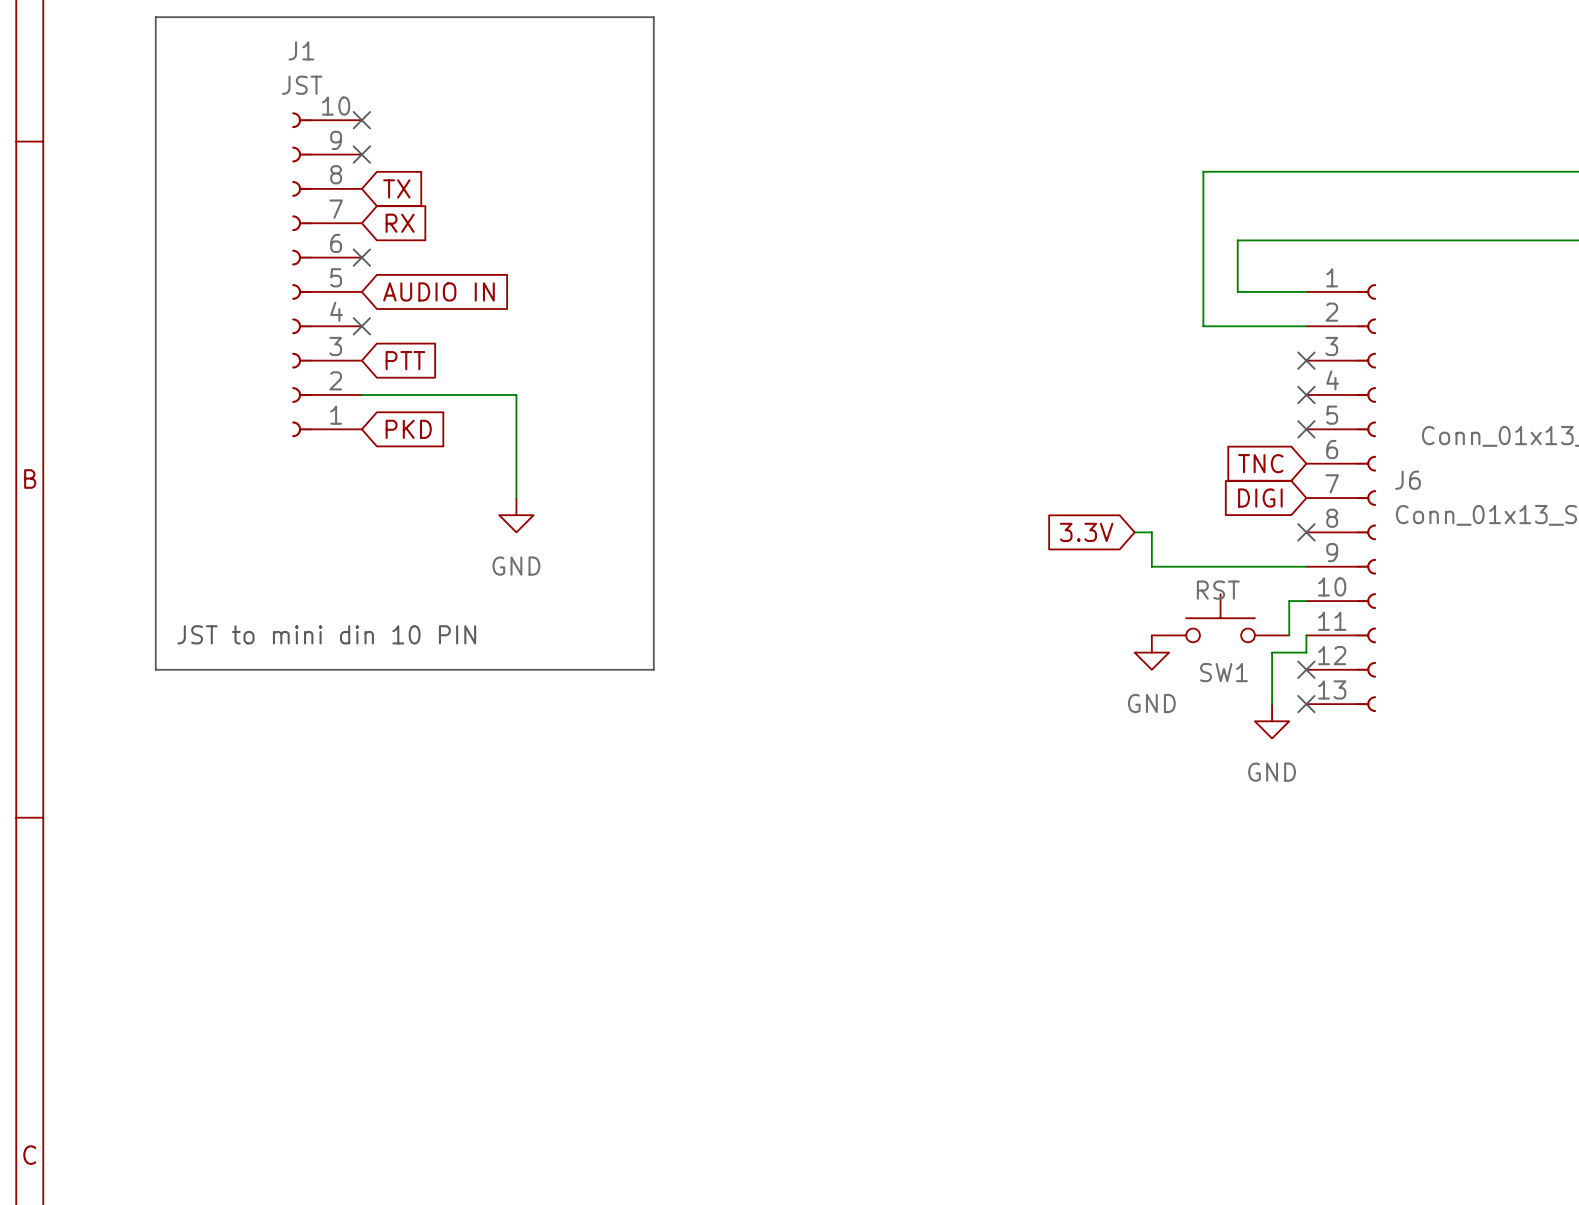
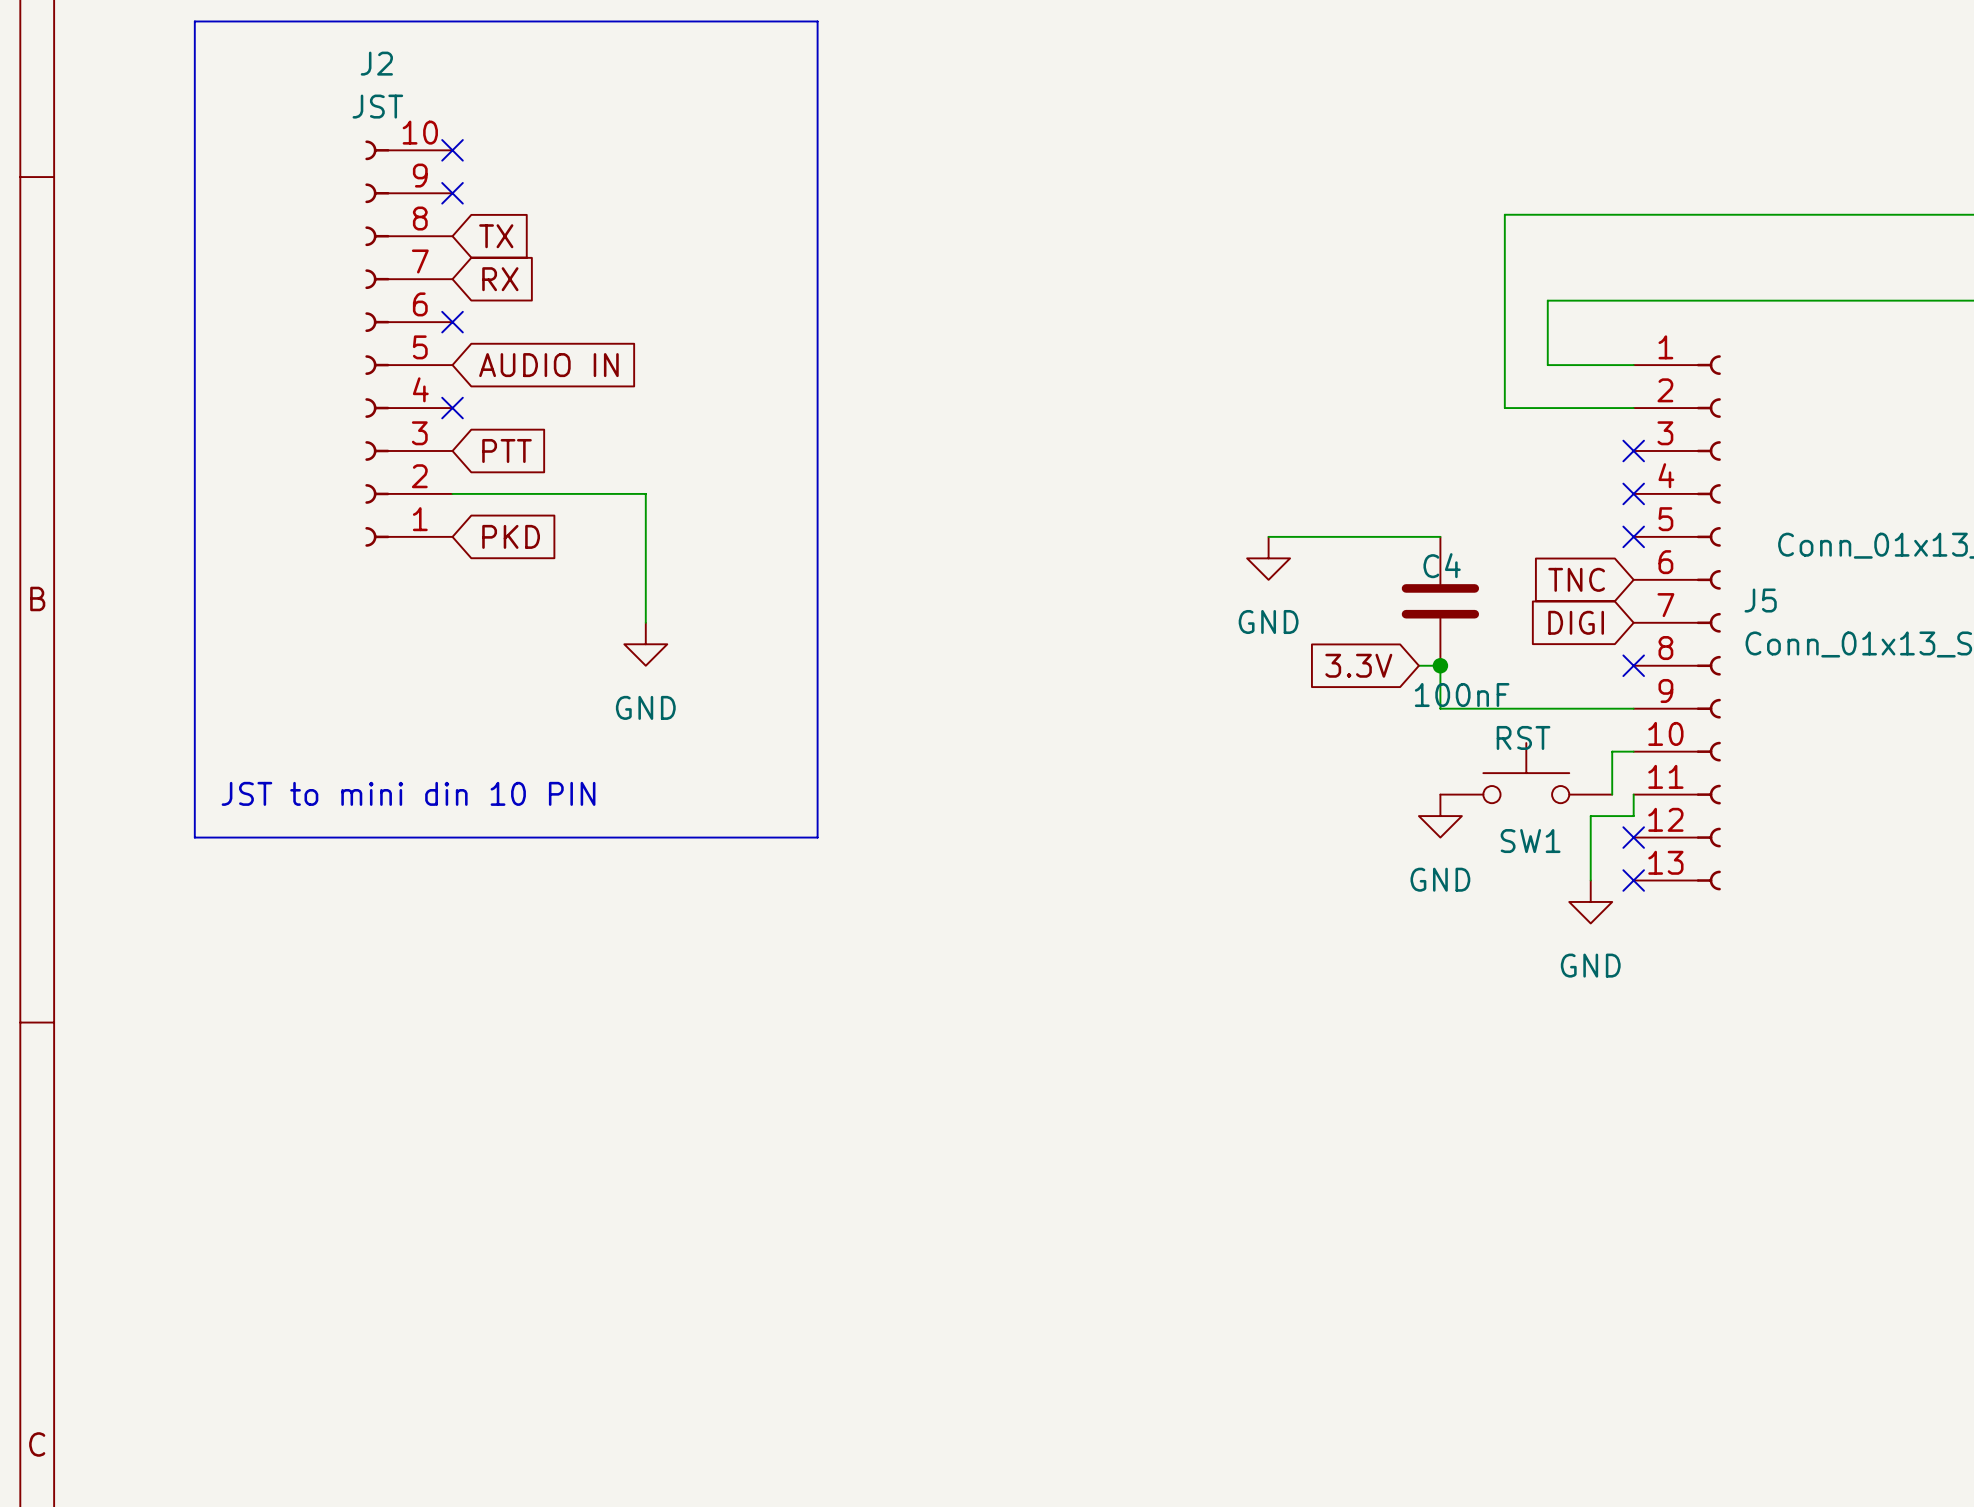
J1 name: J1 (301, 50) -> J2 (376, 63)
wire: none -> (1268, 536) (1440, 536)
power symbol: none -> GND (1268, 558)
C4: none -> 100nF (1440, 601)
J6 name: J6 (1407, 480) -> J5 (1760, 600)
junction: none -> (1440, 665)

